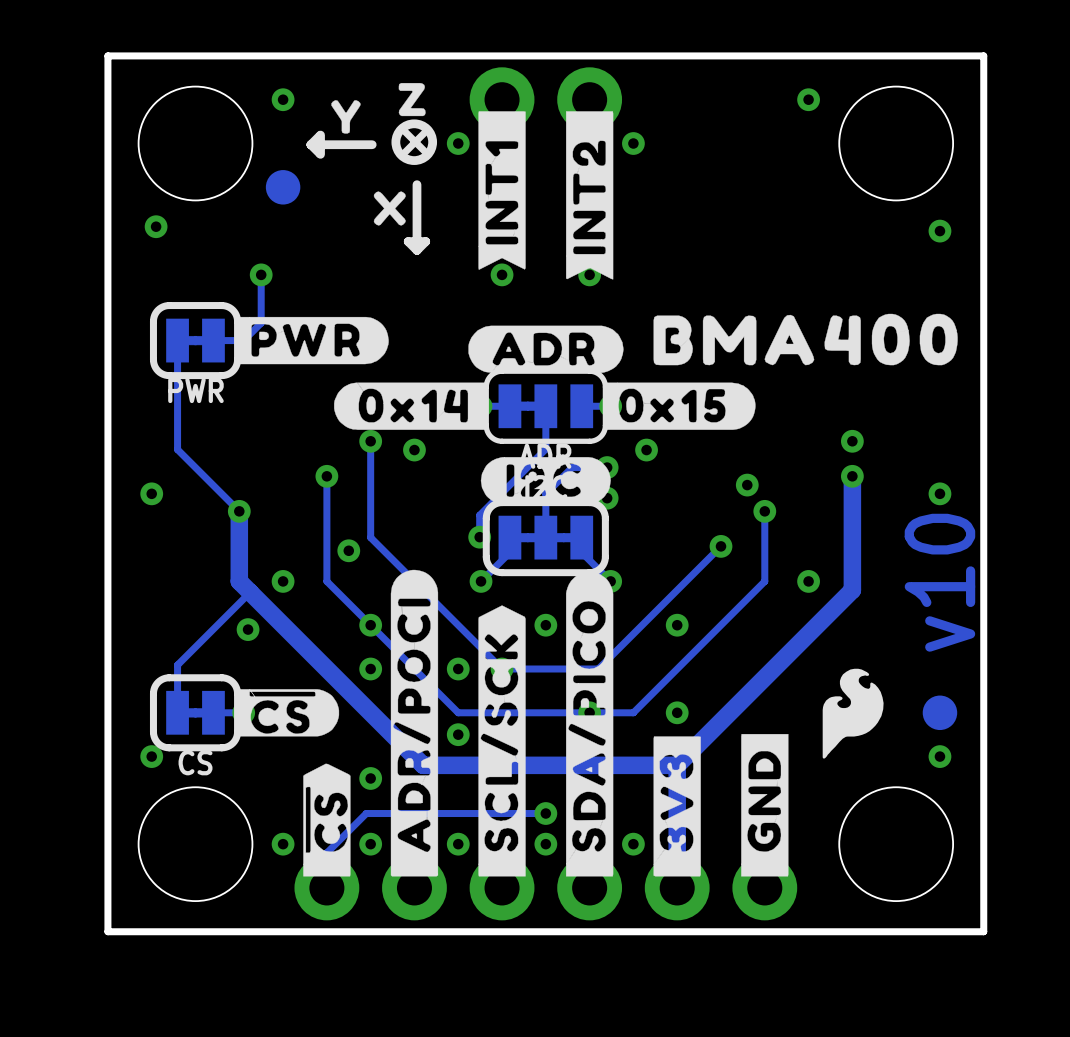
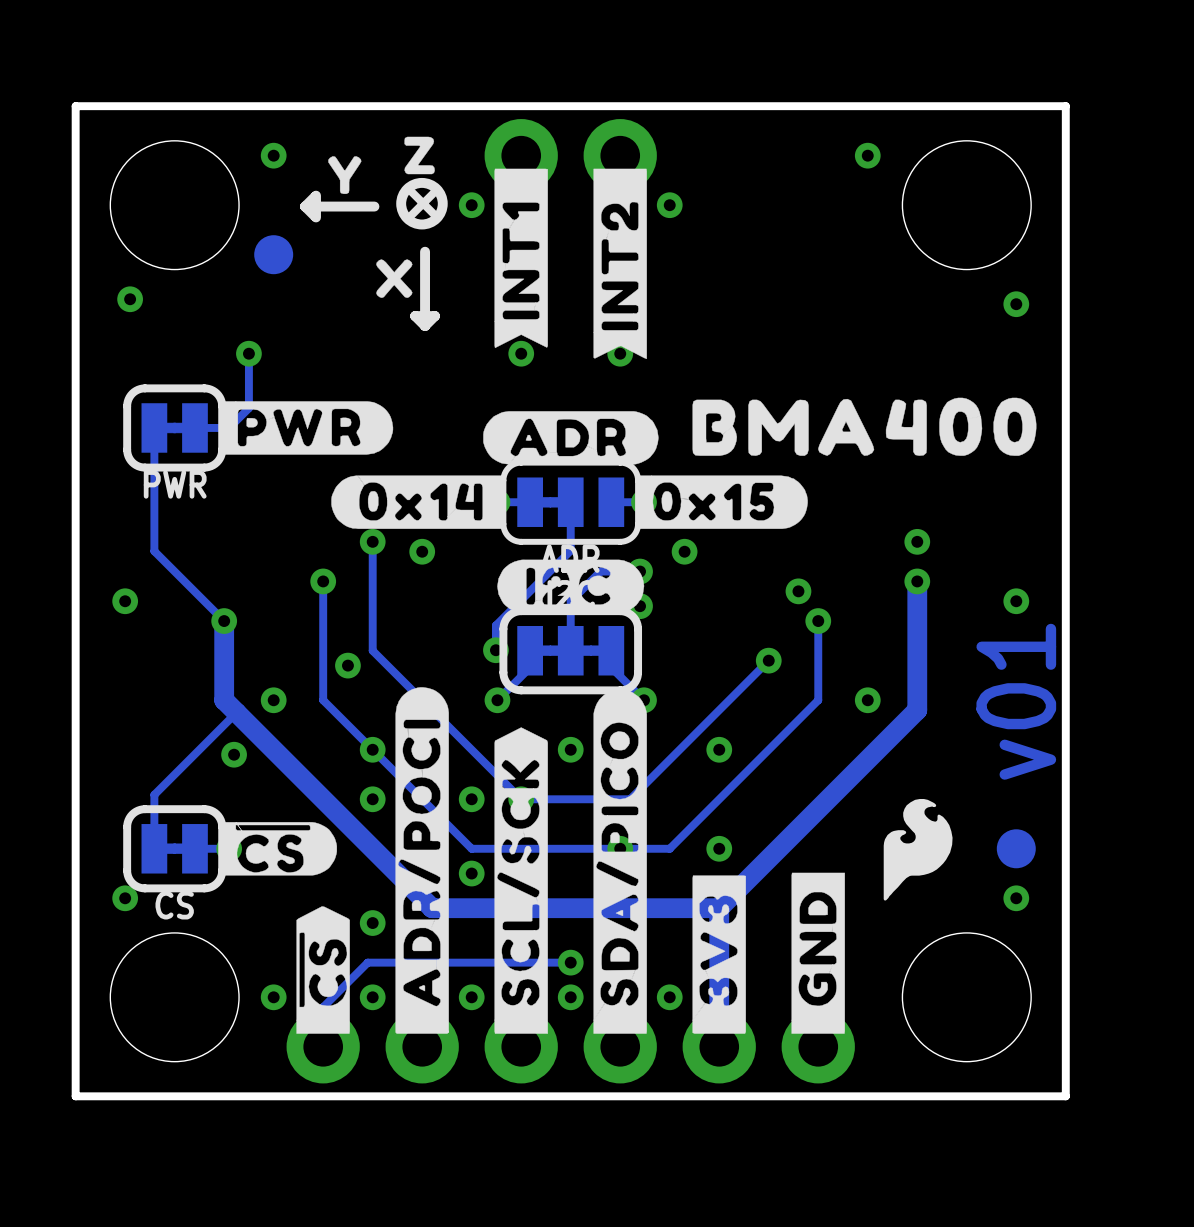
text: v10 (939, 582) -> v01 (1016, 701)

